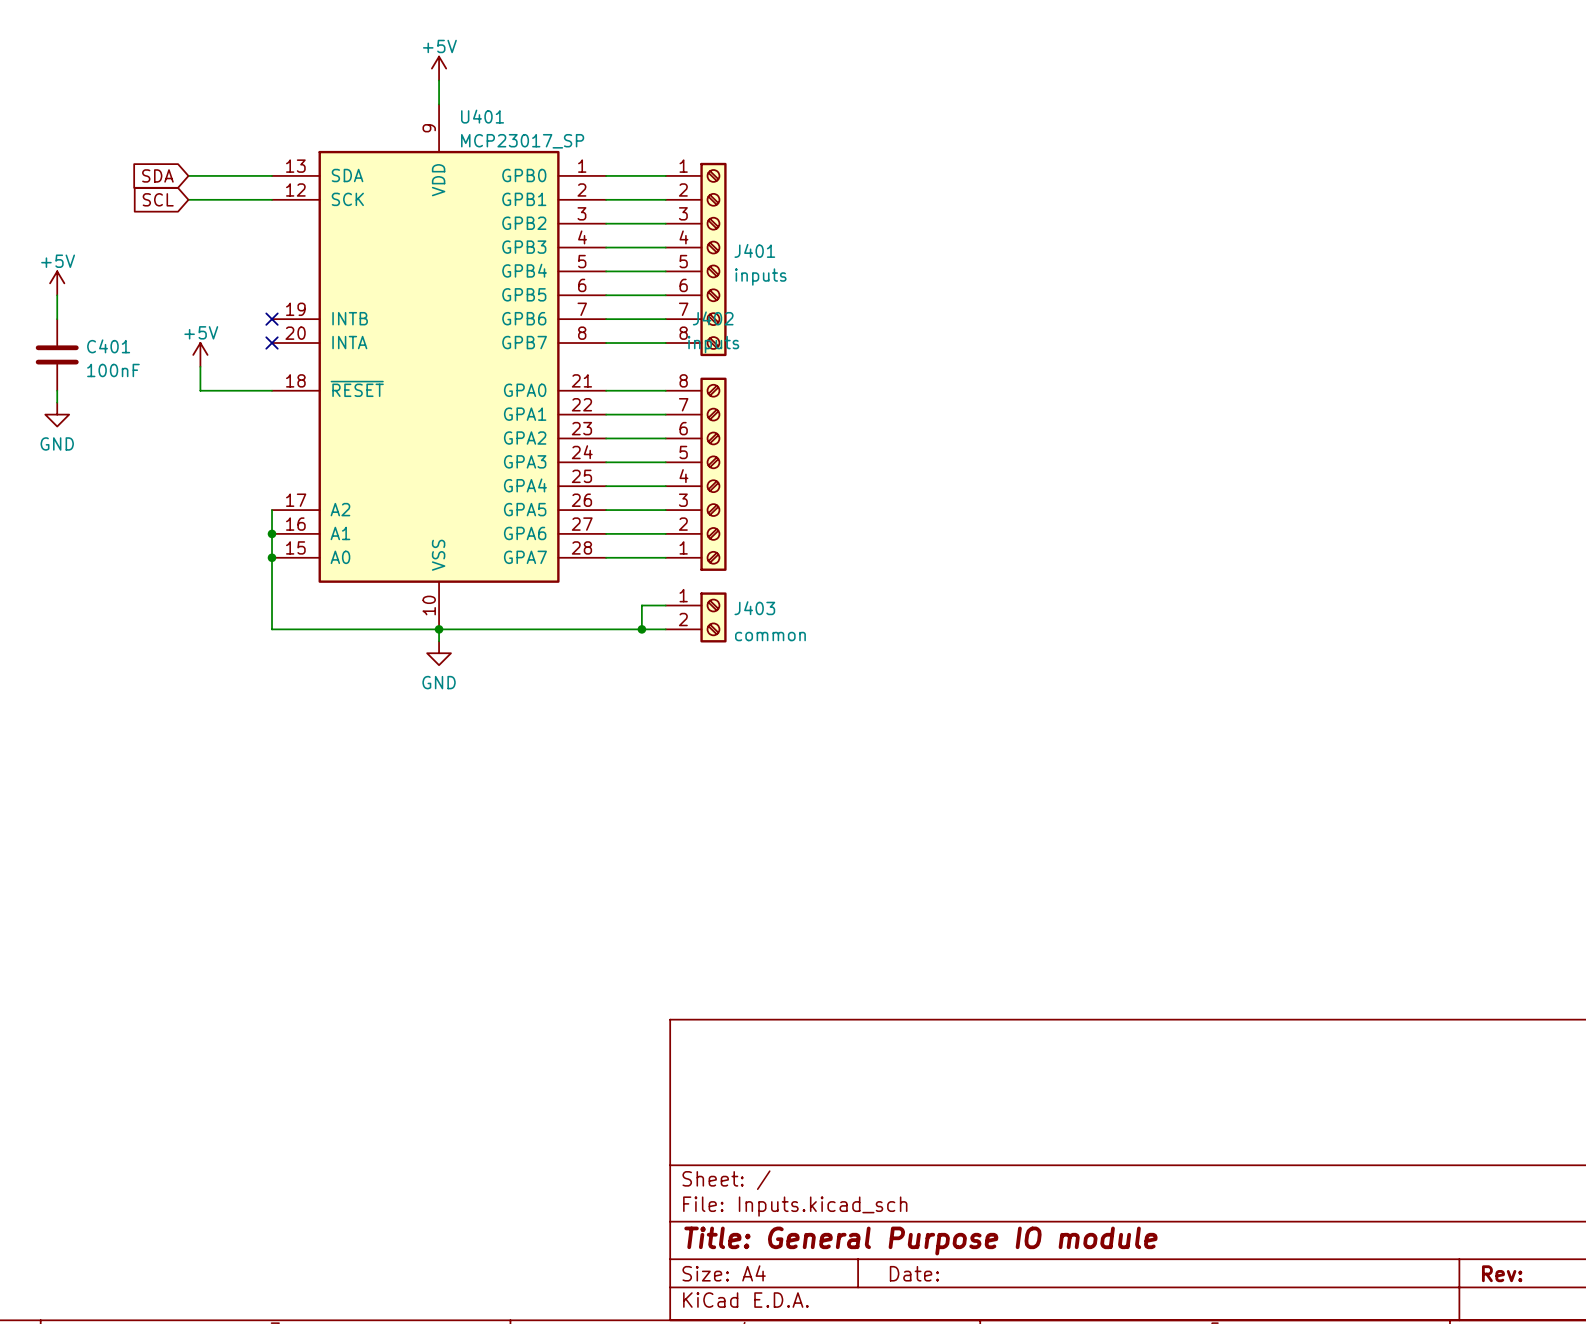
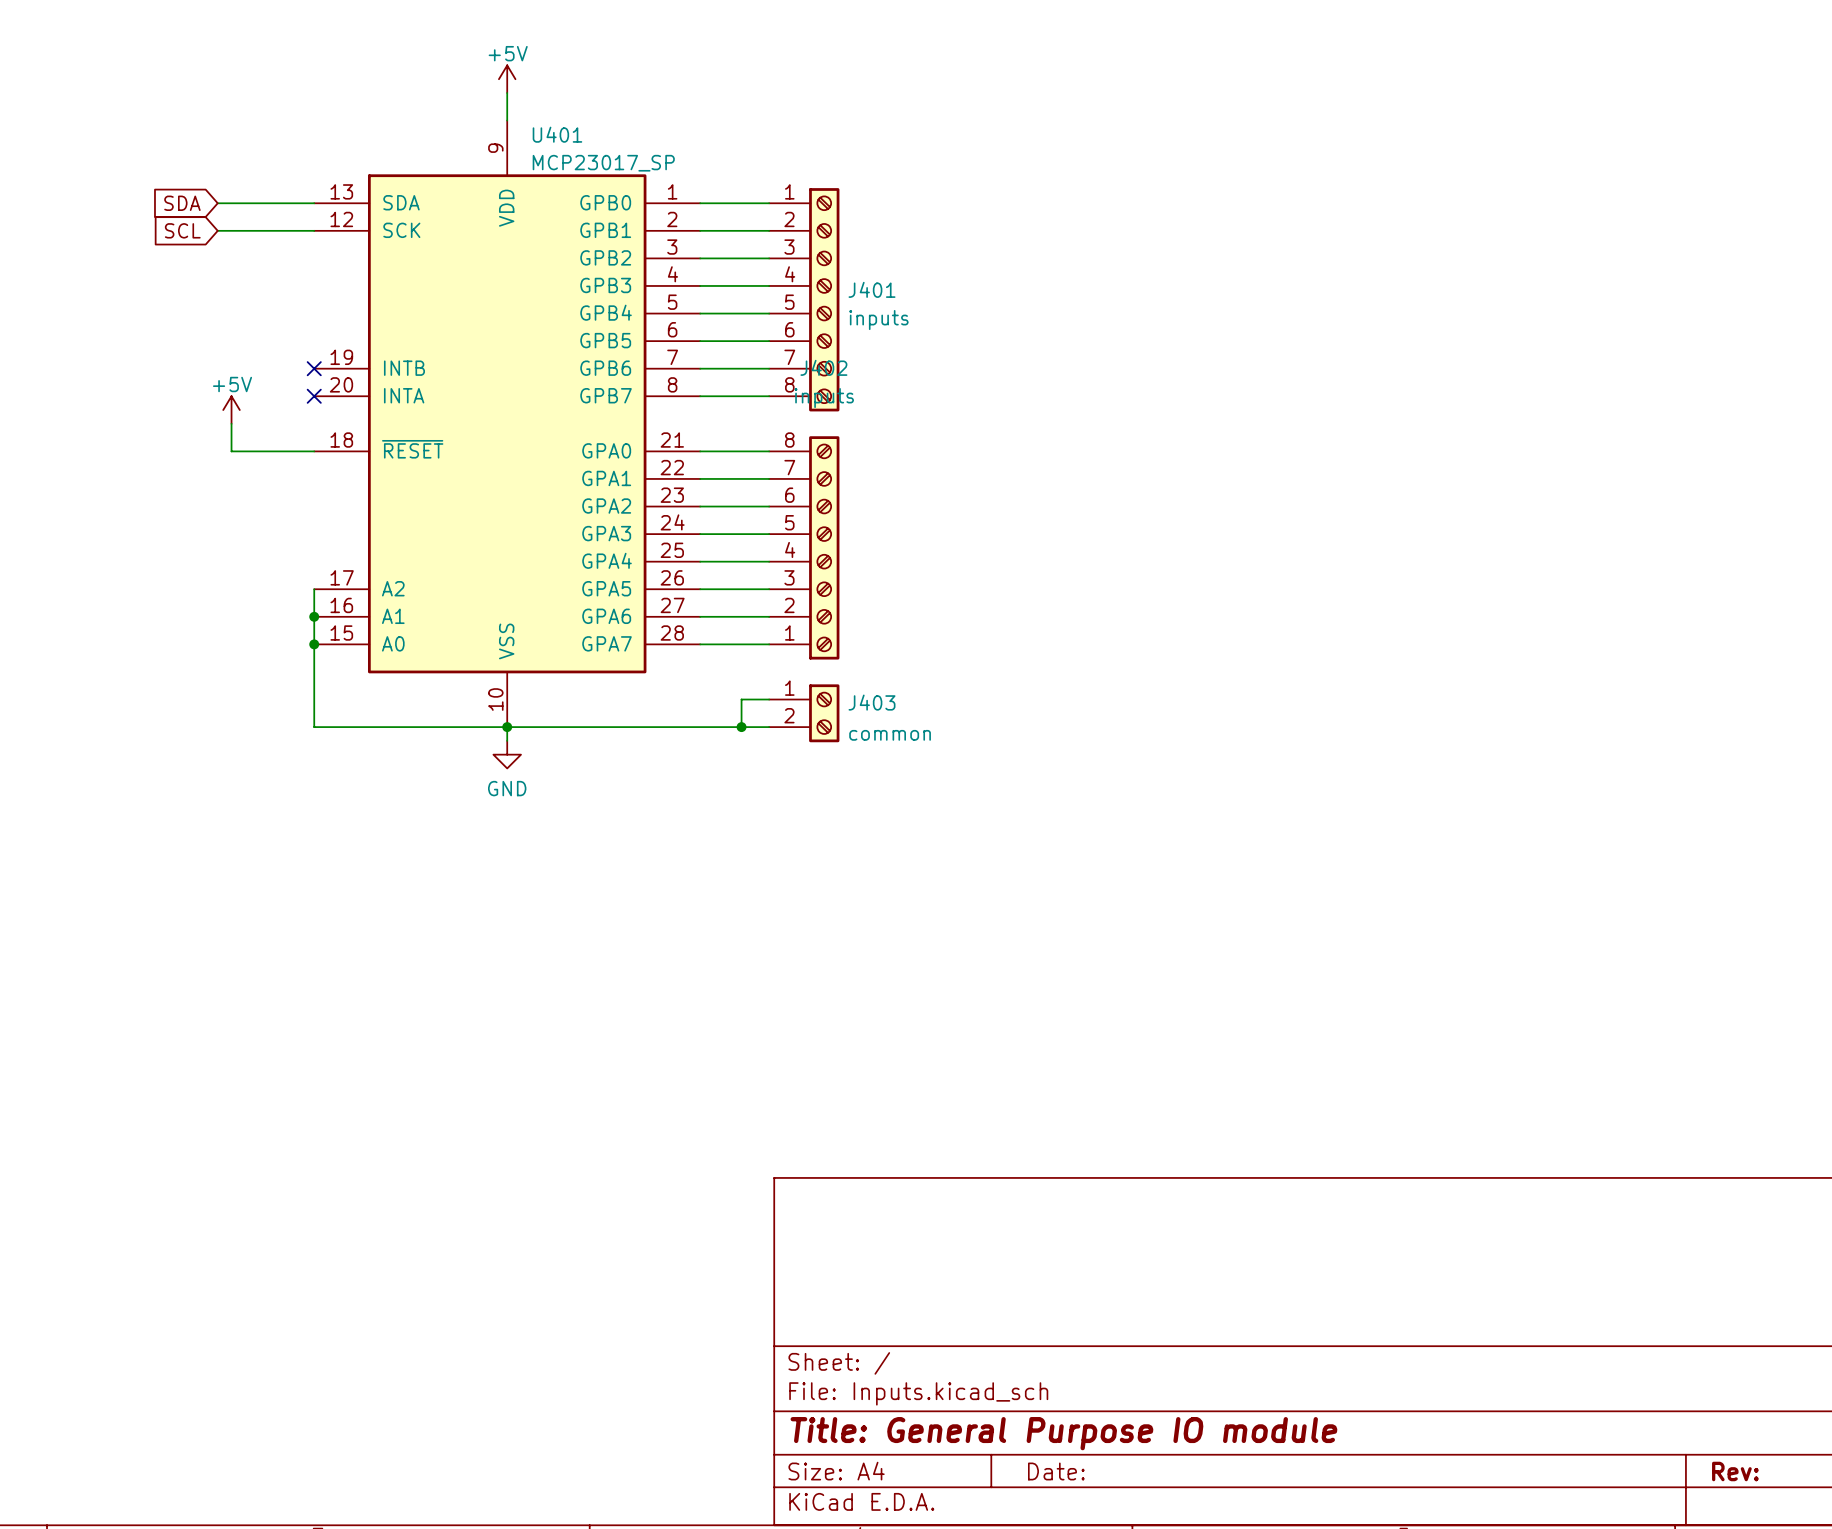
power symbol: +5V (57, 283) -> none
wire: (57, 295) (57, 319) -> none
C401: 100nF (57, 354) -> none
wire: (57, 390) (57, 402) -> none
power symbol: GND (57, 414) -> none

